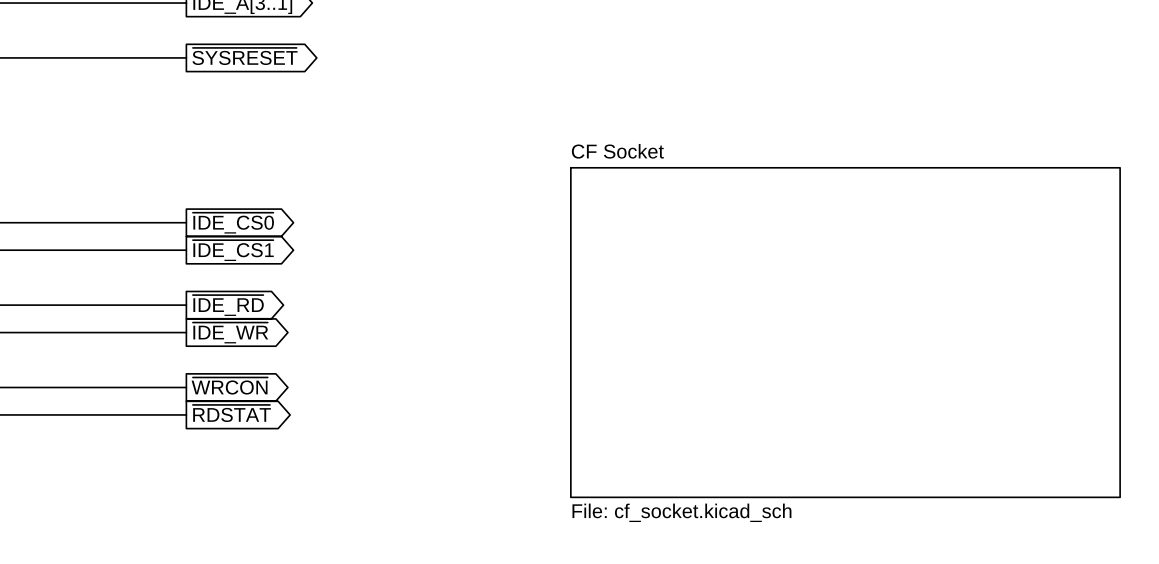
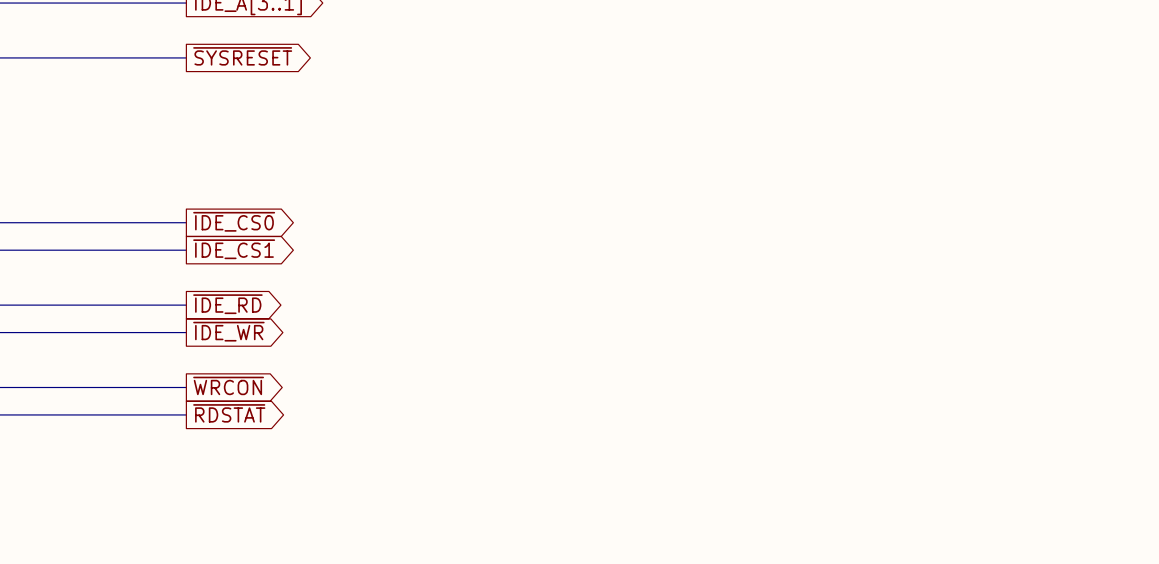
sheet CF Socket: File: cf_socket.kicad_sch (845, 332) -> none

